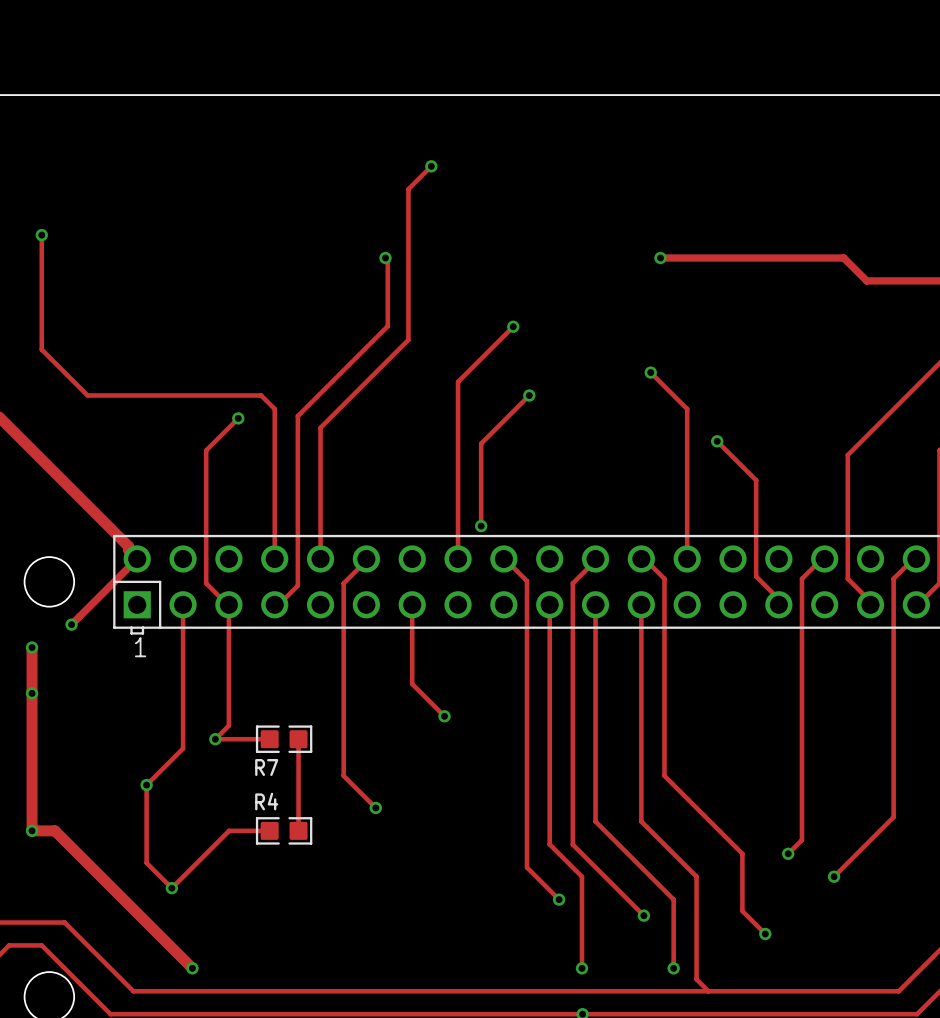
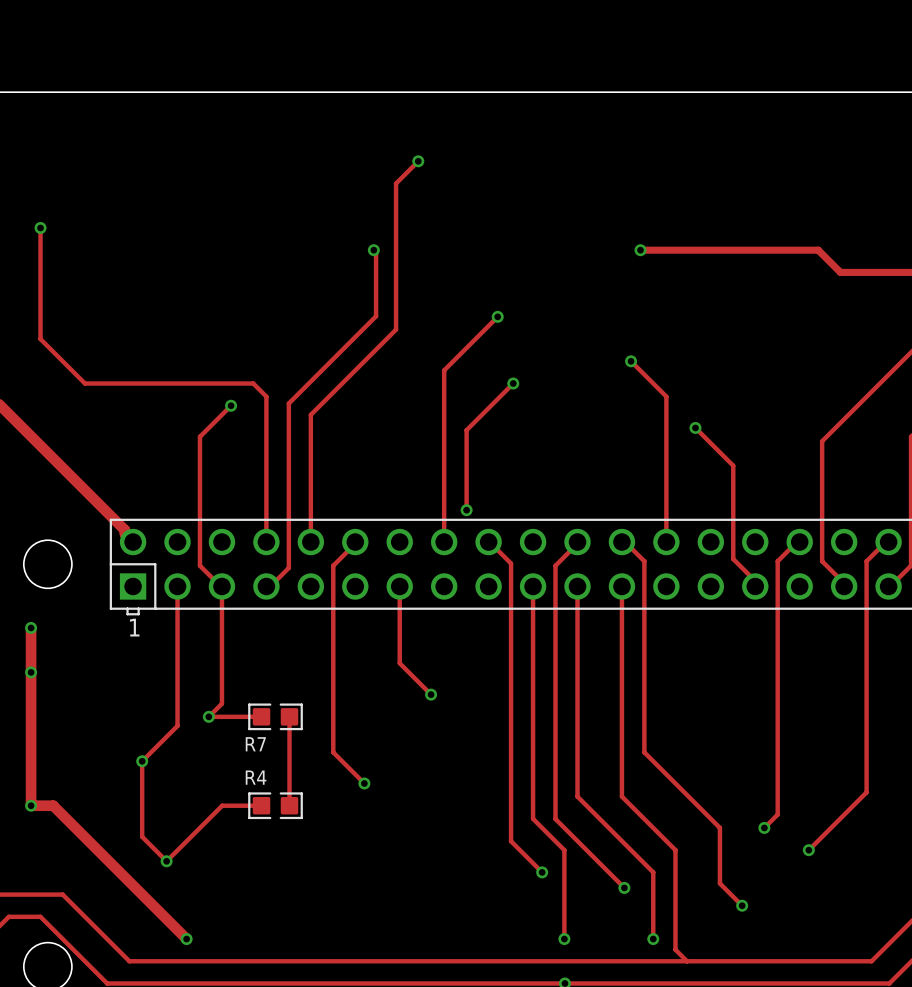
track: (137, 558) (71, 624) -> none
via: (71, 624) -> none

